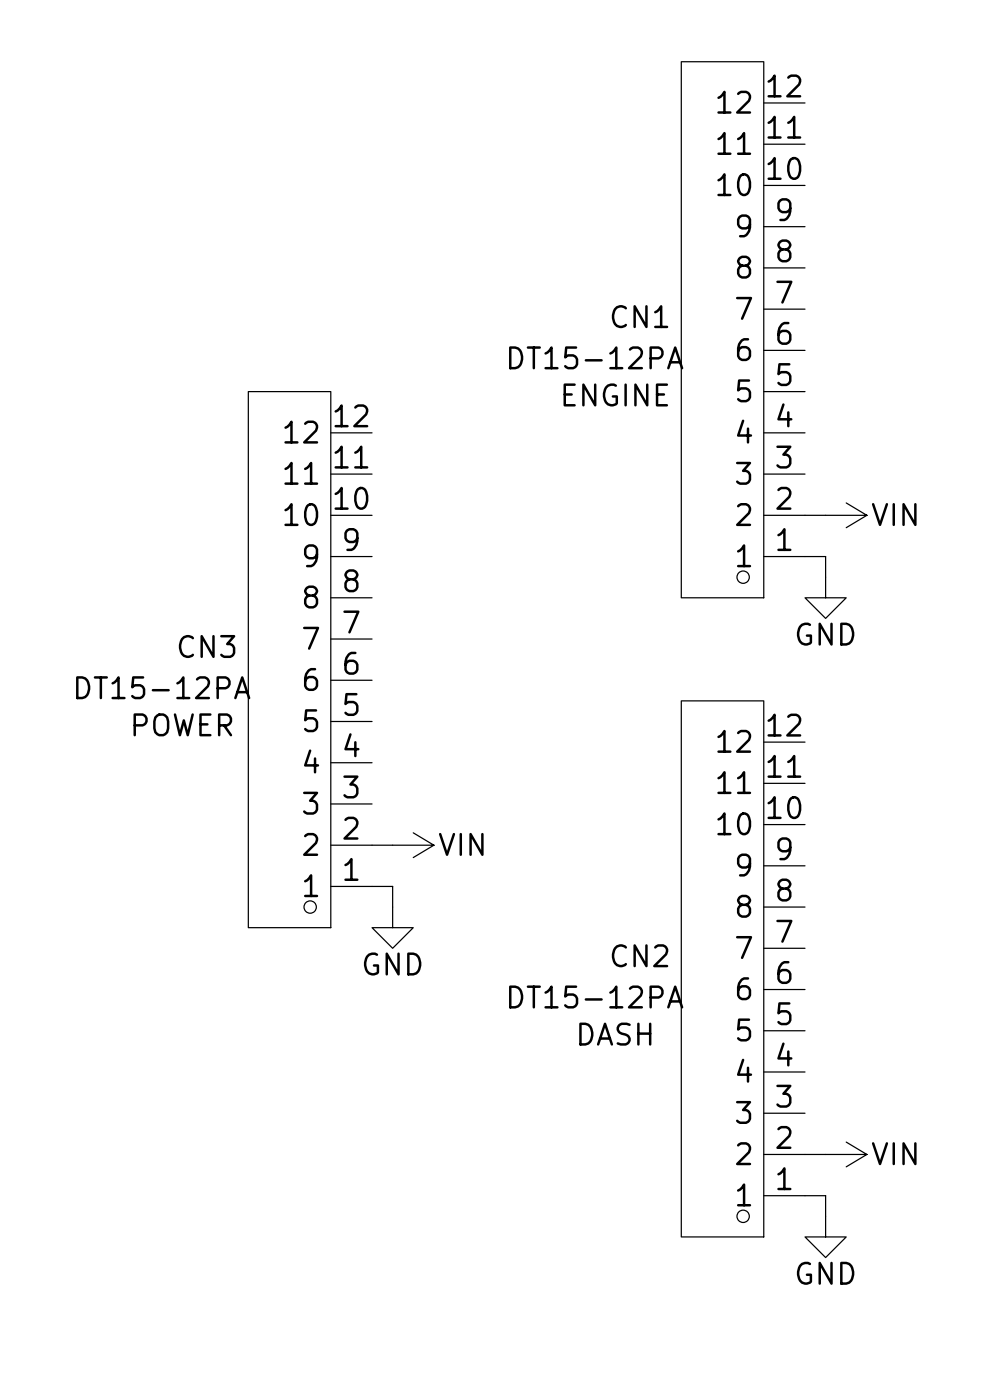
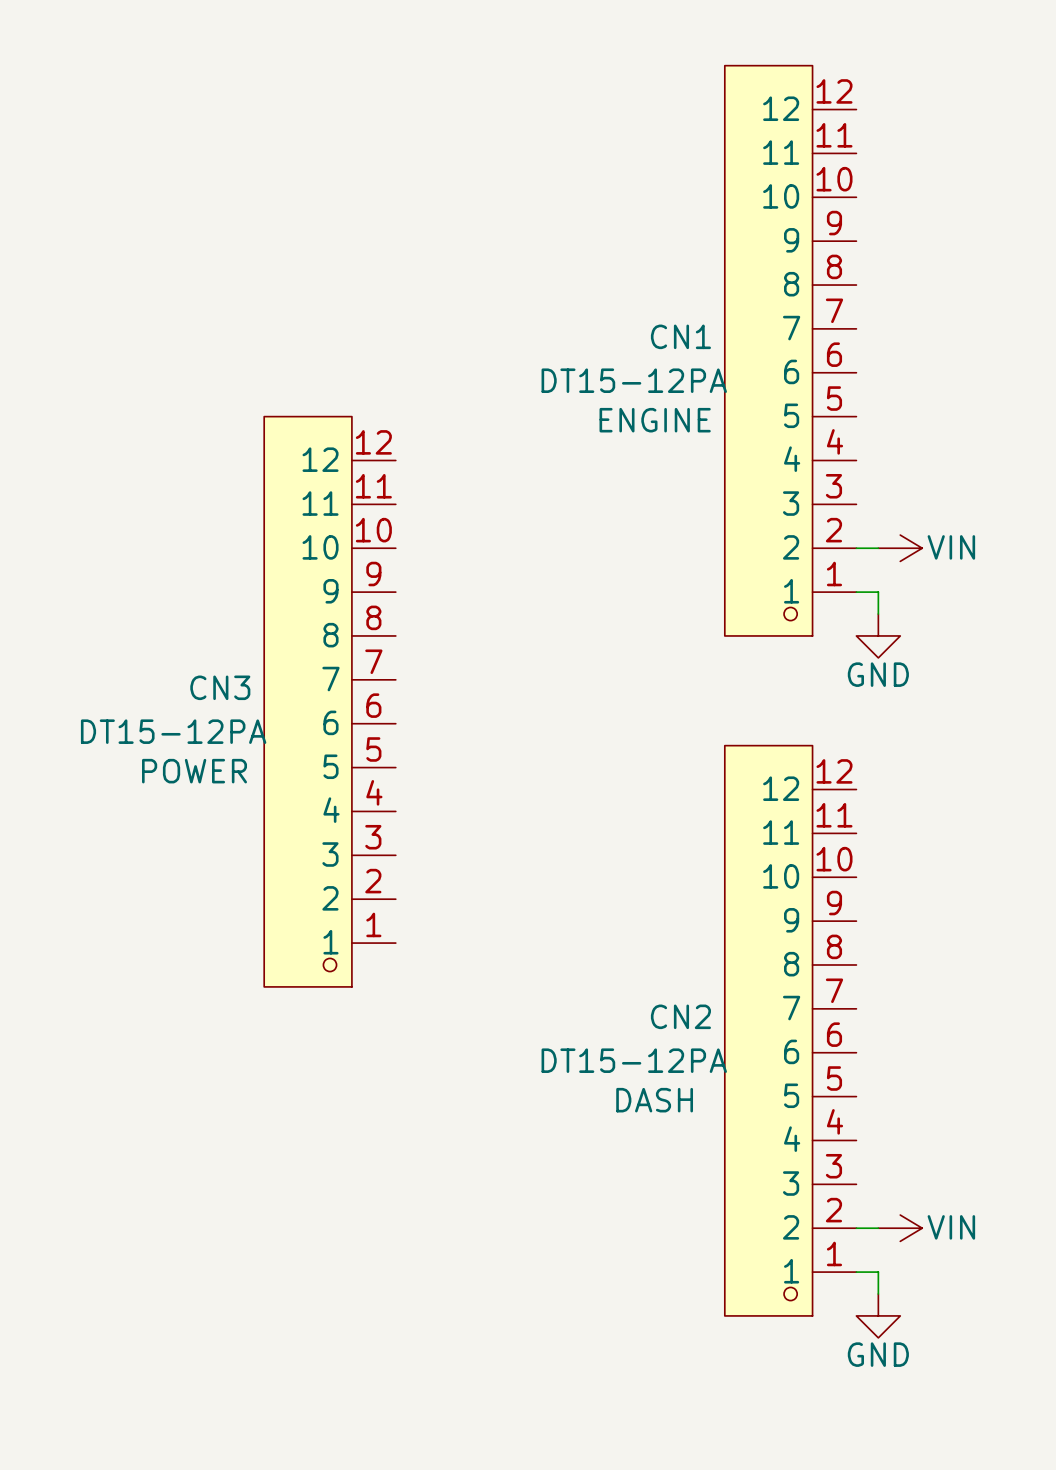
wire: (372, 845) (392, 845) -> none
power symbol: VIN (413, 845) -> none
wire: (372, 886) (392, 886) (392, 907) -> none
power symbol: GND (392, 927) -> none

